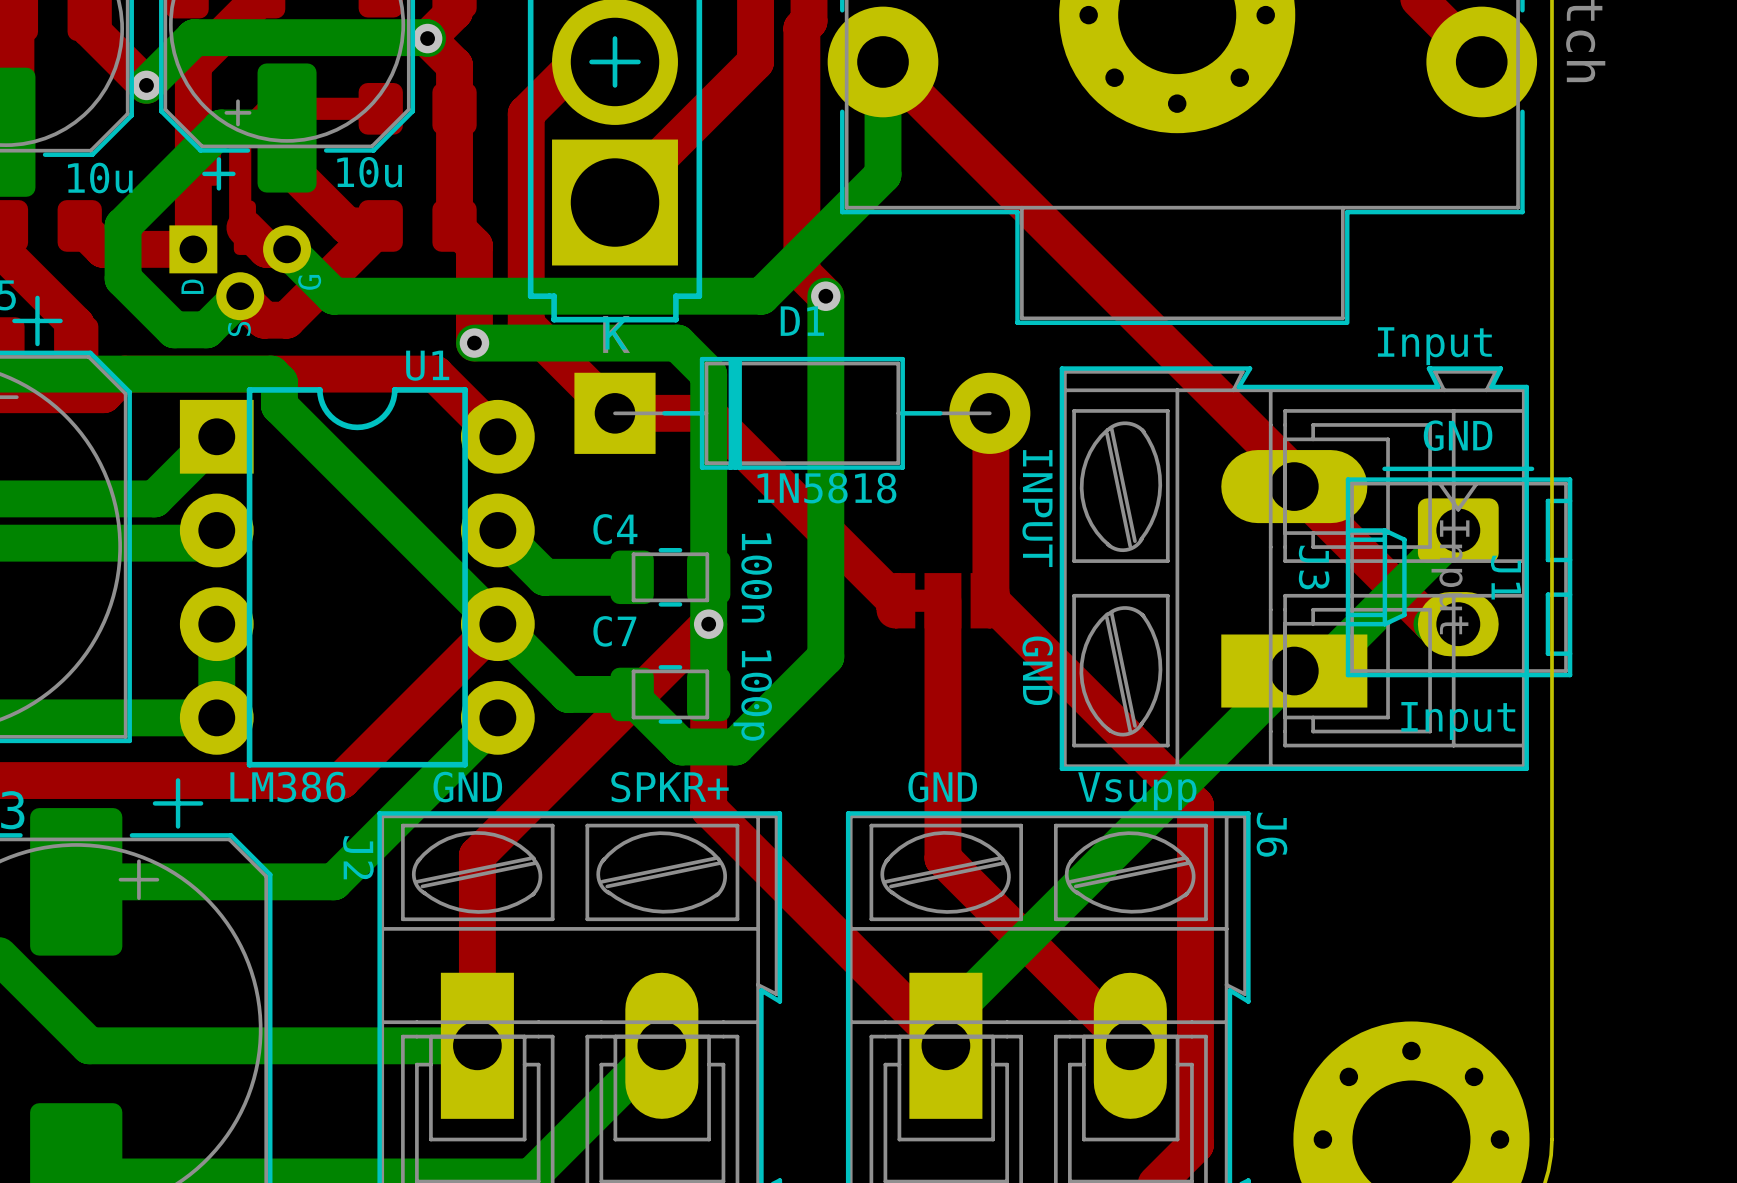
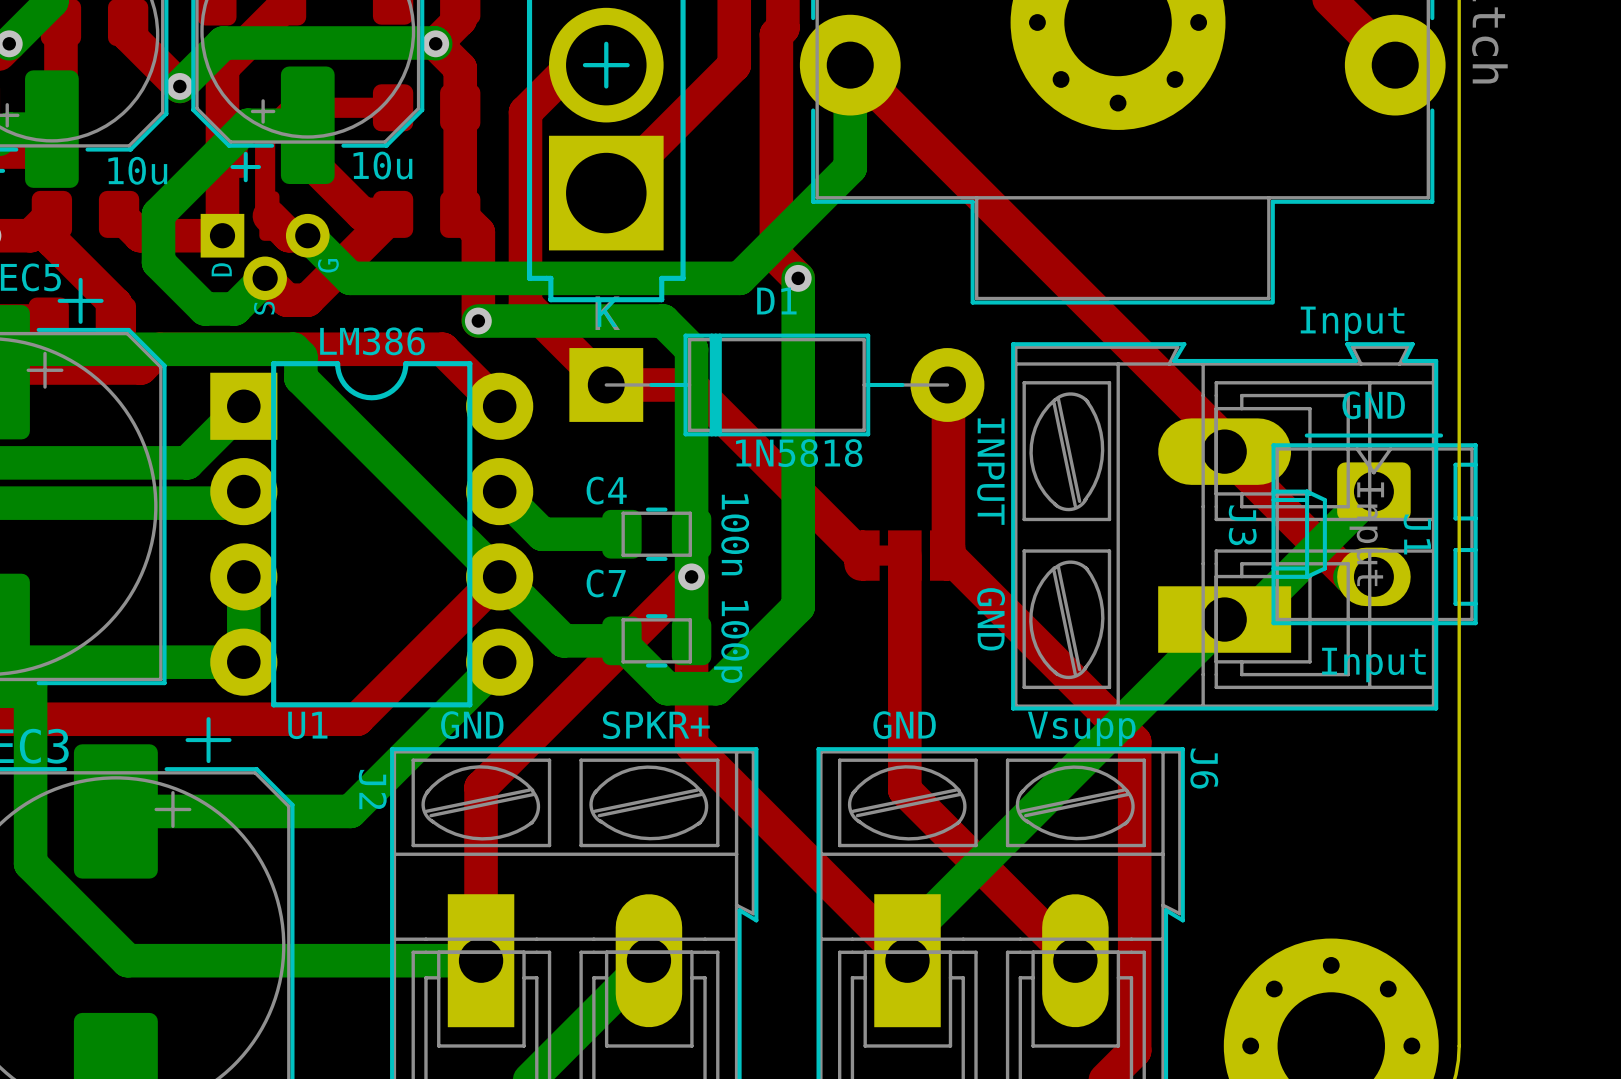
U1 name position: U1 (427, 365) -> U1 (307, 725)
U1 value position: LM386 (287, 787) -> LM386 (372, 341)

